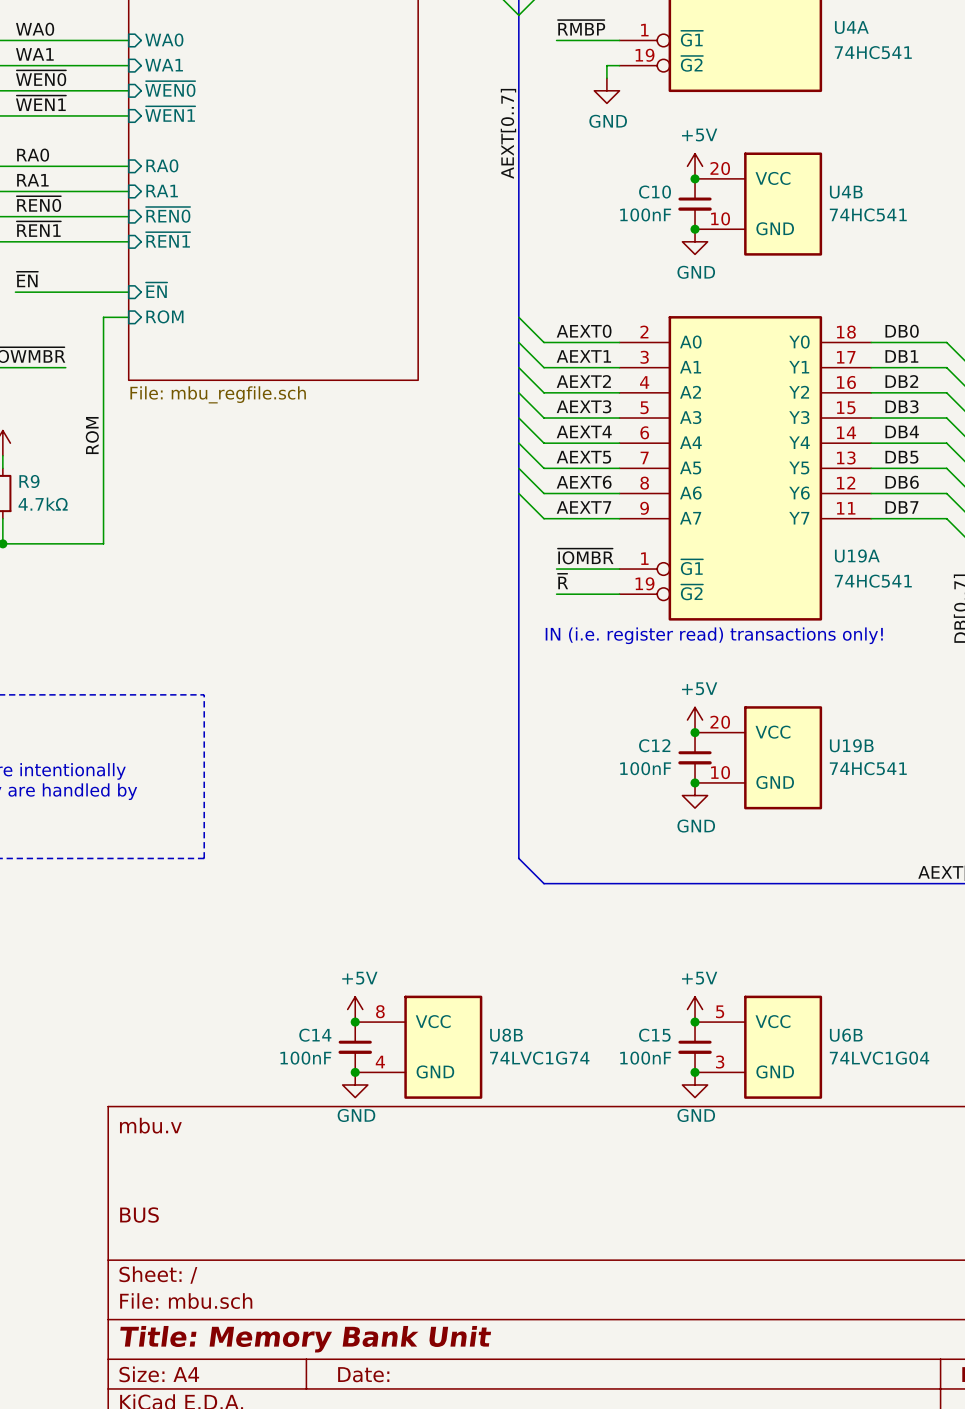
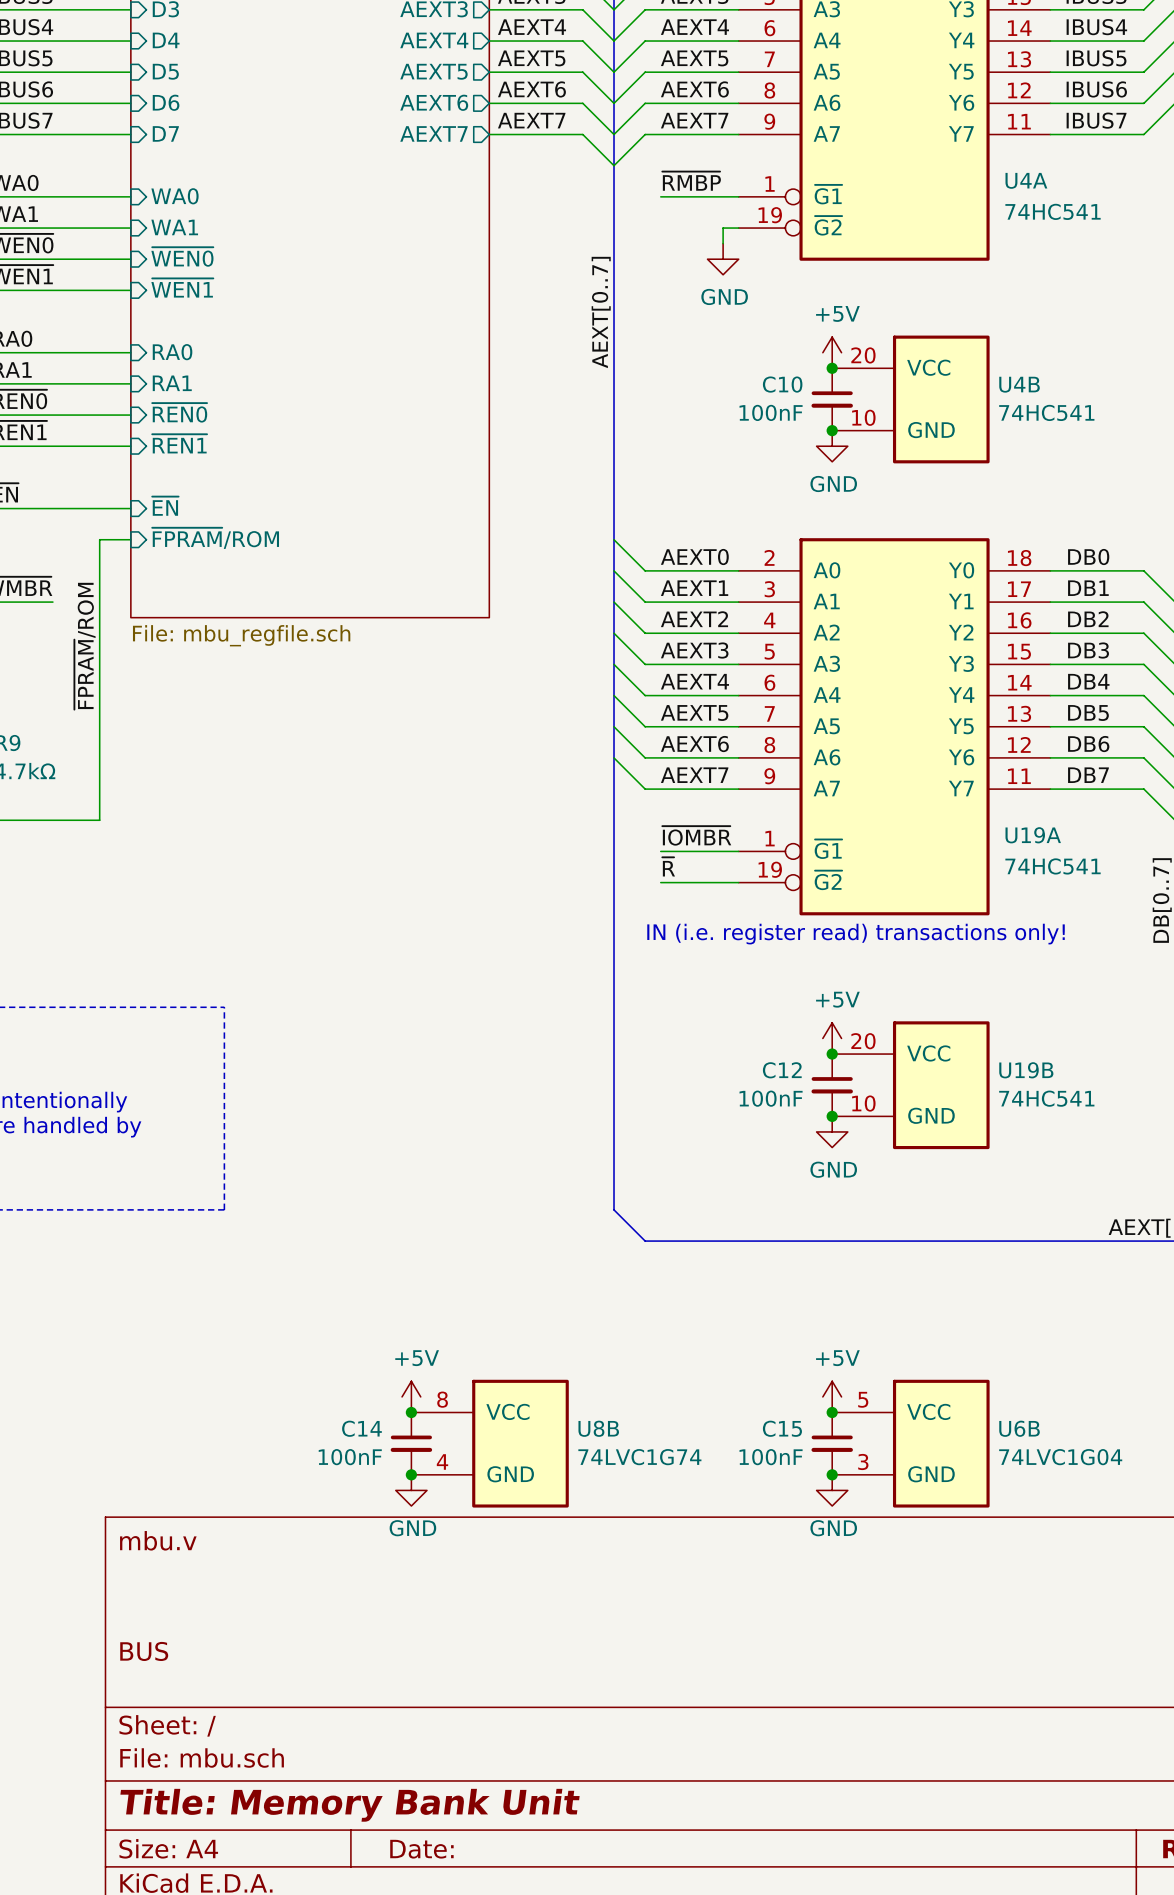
sheet pin: ROM (164, 316) -> ~{FPRAM}∕ROM (215, 538)
label: ROM (92, 435) -> ~{FPRAM}∕ROM (84, 646)

